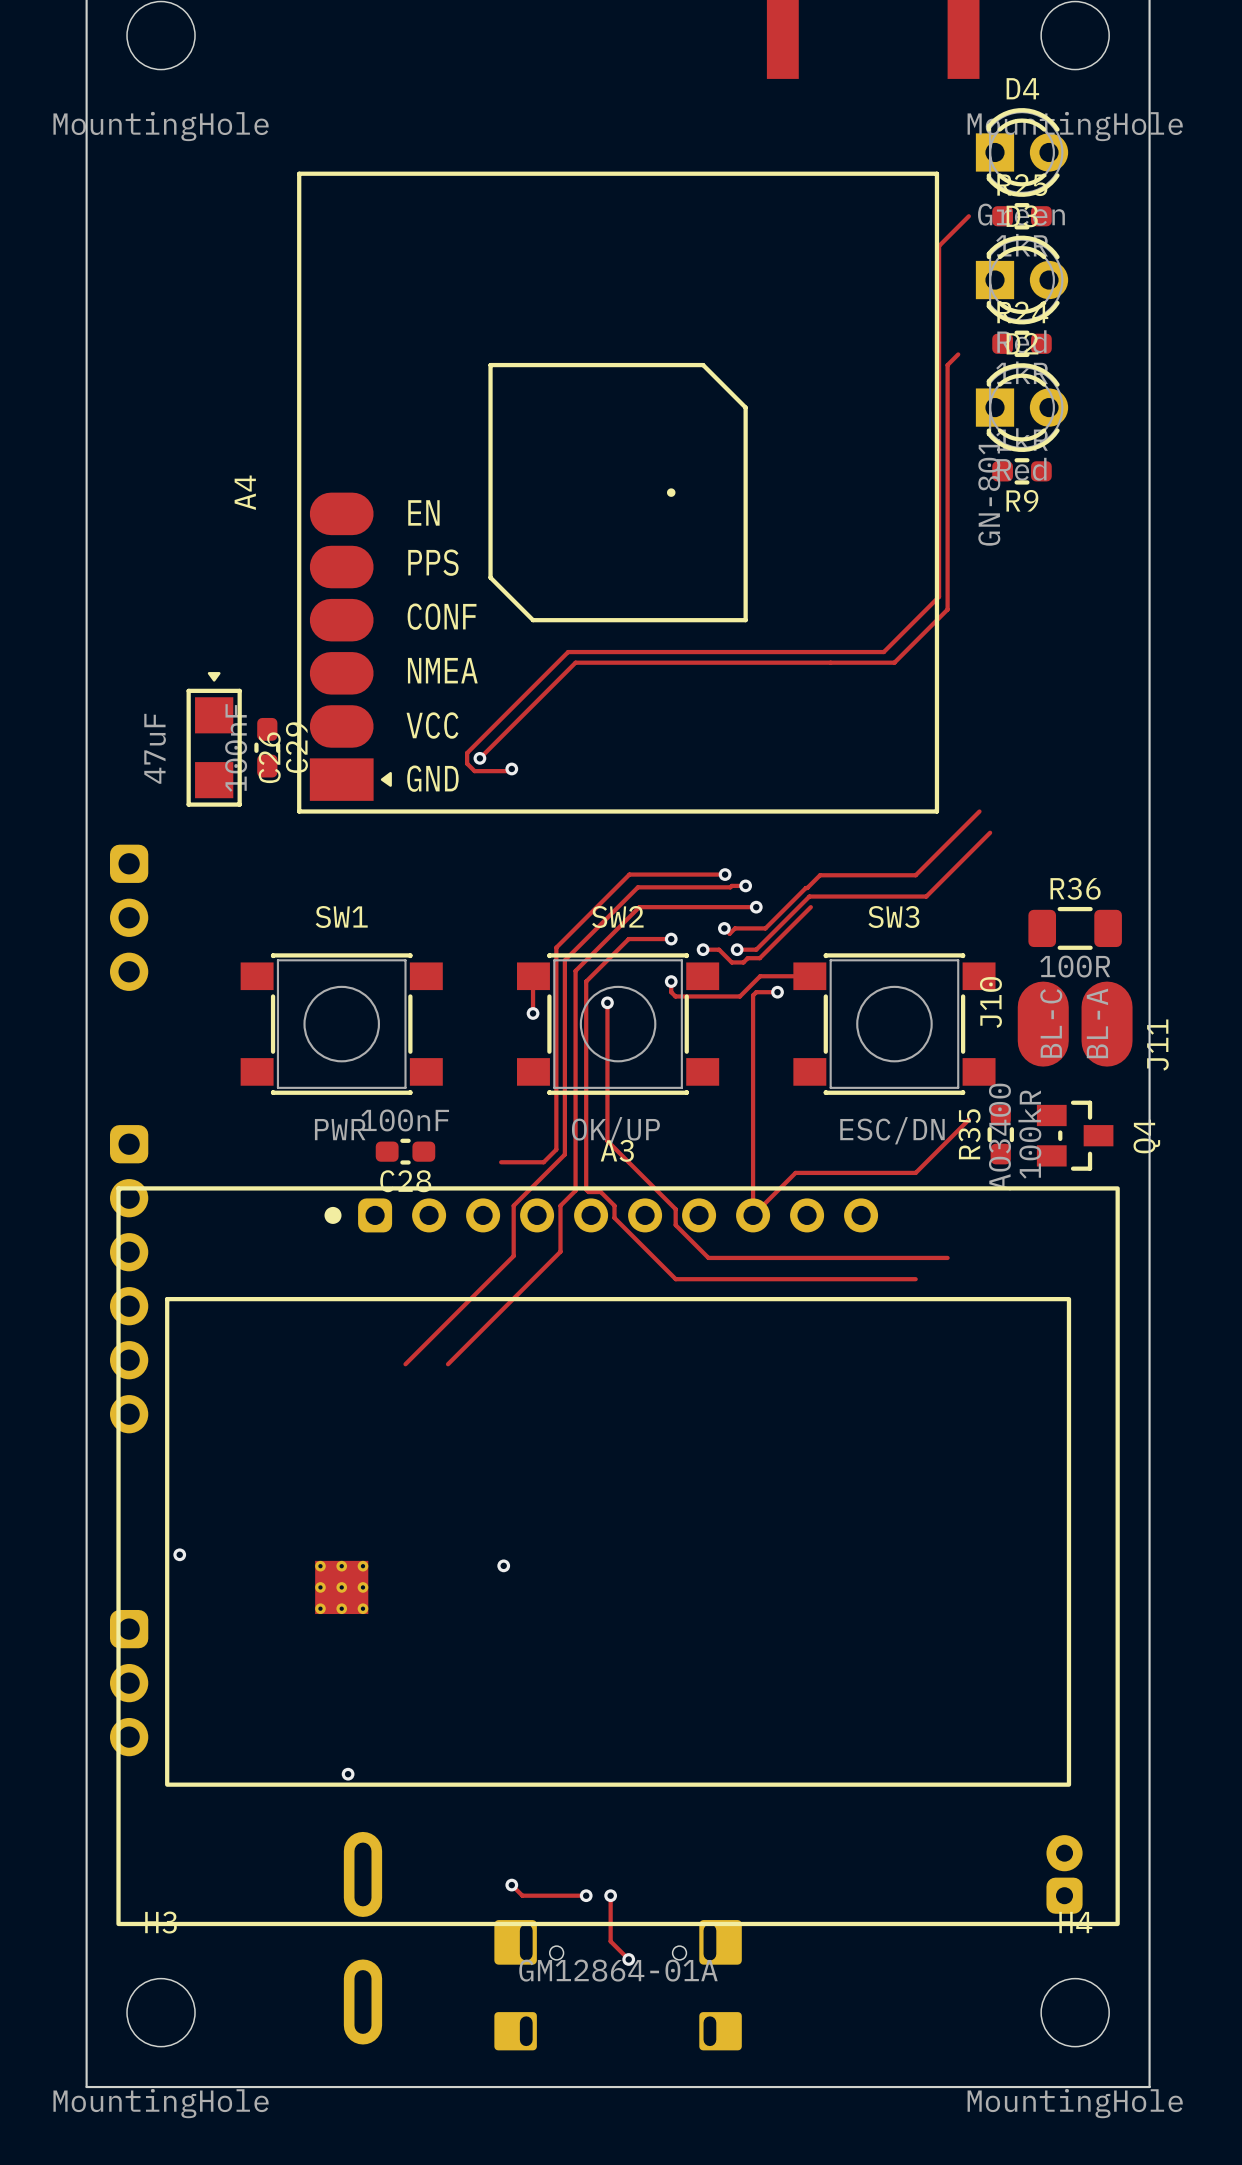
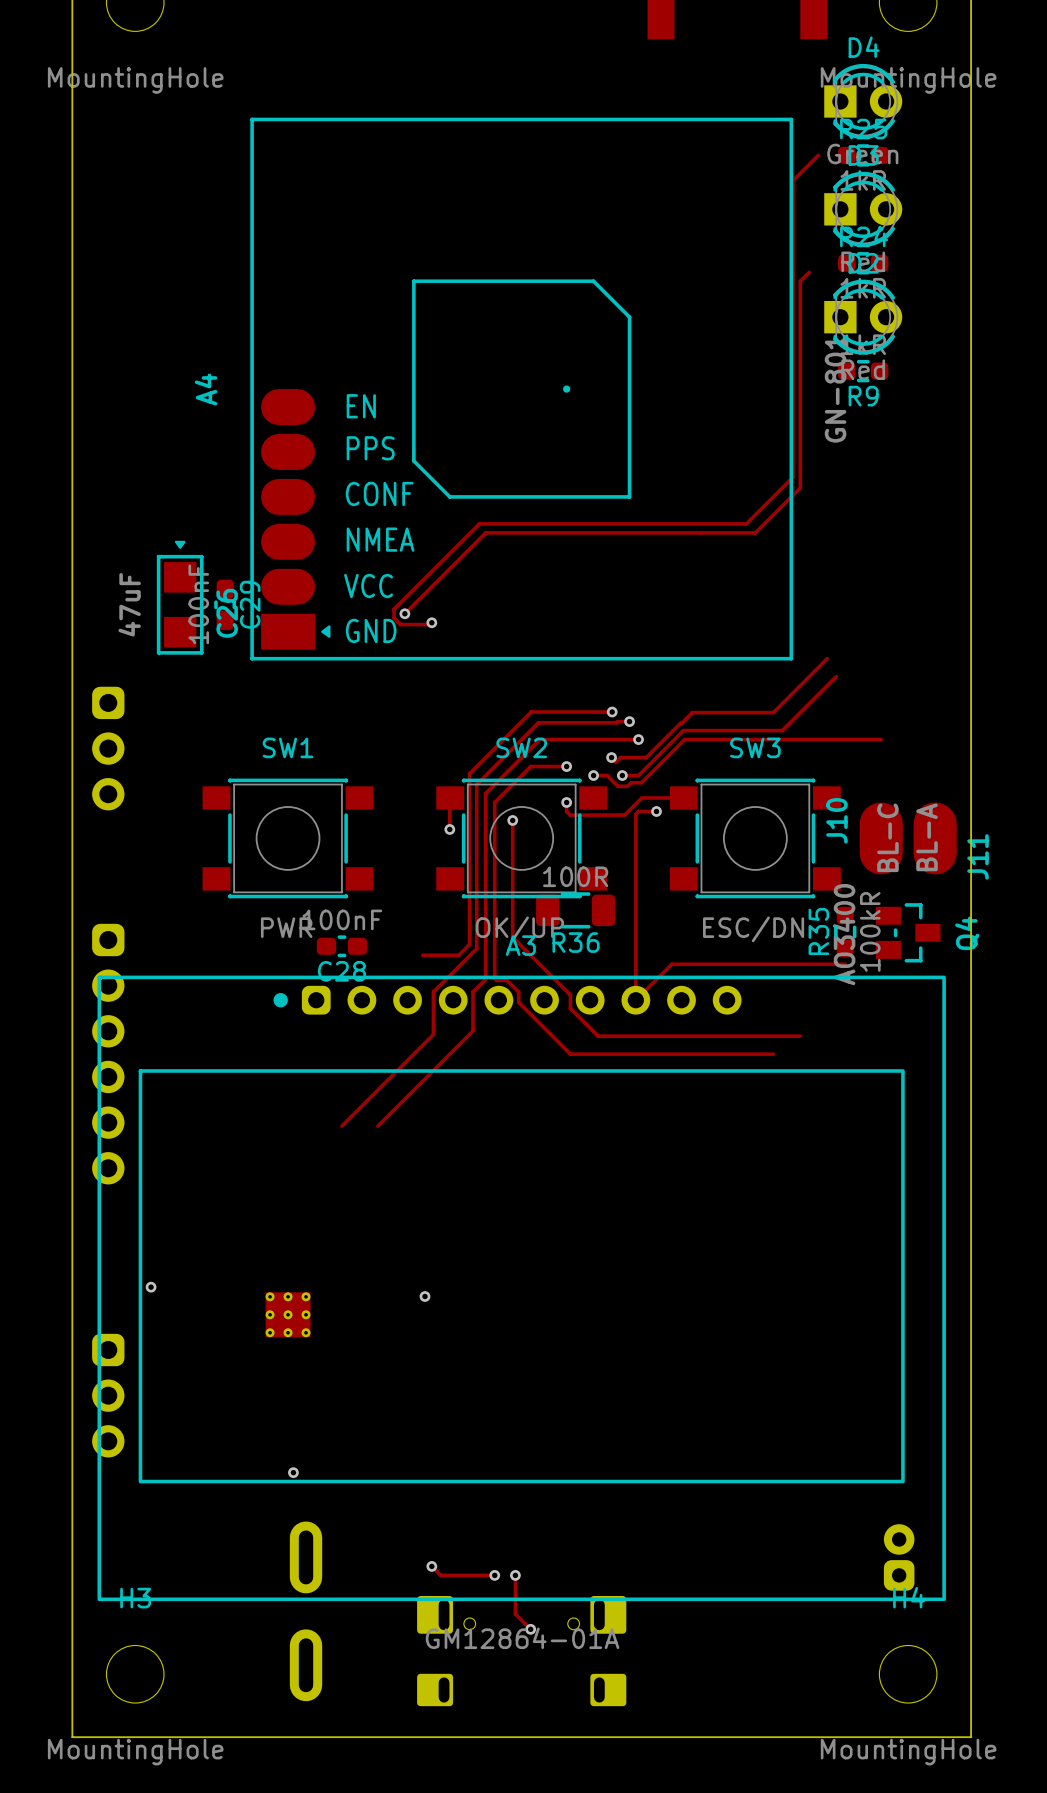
R36 name position: R36 (1075, 888) -> R36 (576, 942)
track: none -> (684, 739) (881, 739)
R36 position: (1075, 928) -> (575, 910)
R36 value position: 100R (1075, 966) -> 100R (575, 876)
track: (968, 1119) (915, 1172) -> (845, 964) (773, 964)

